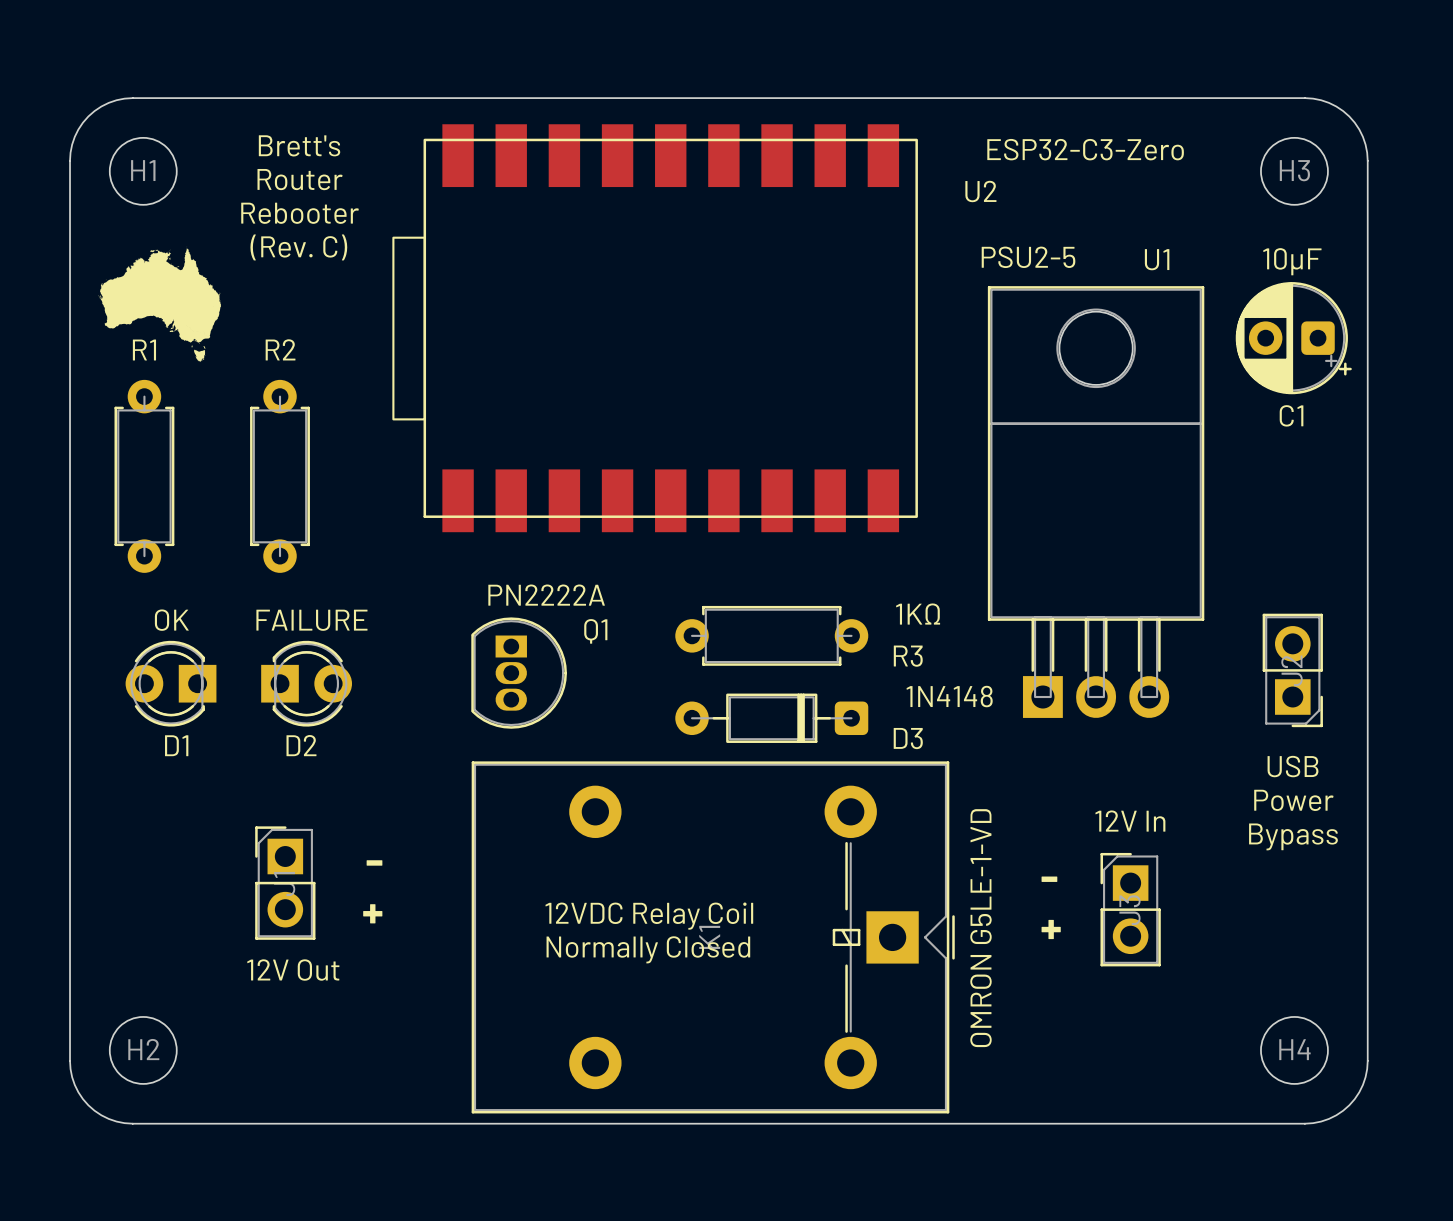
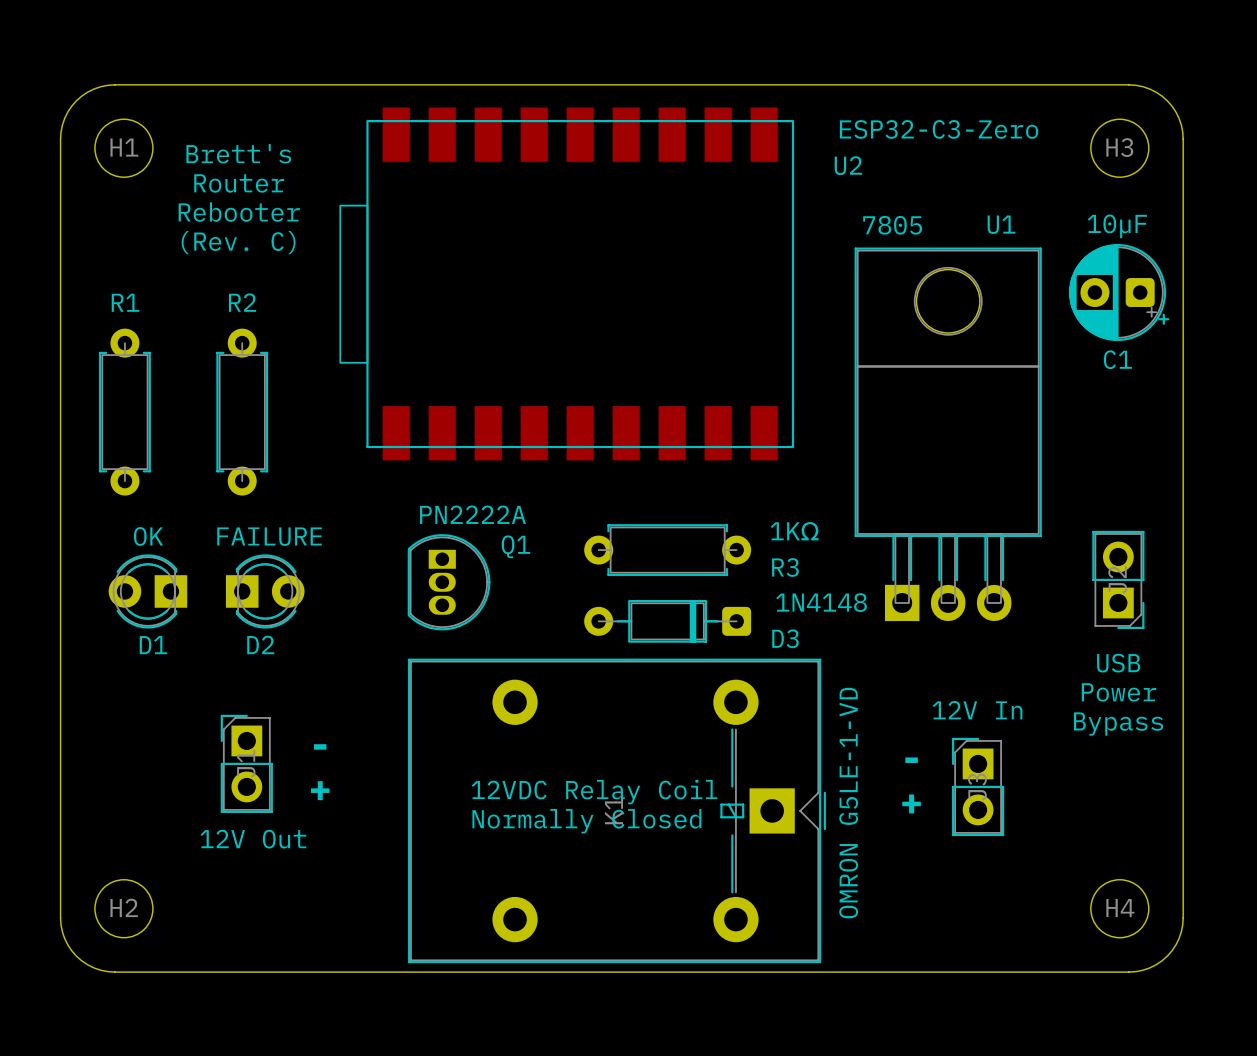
text position: Brett's (299, 145) -> Brett's (238, 153)
text position: Router (300, 179) -> Router (239, 183)
text position: Rebooter (300, 213) -> Rebooter (239, 212)
drawing: [98, 246, 222, 362] -> none
text position: (Rev. C) (298, 247) -> (Rev. C) (238, 242)
text: PSU2-5 (1028, 257) -> 7805 (892, 225)

